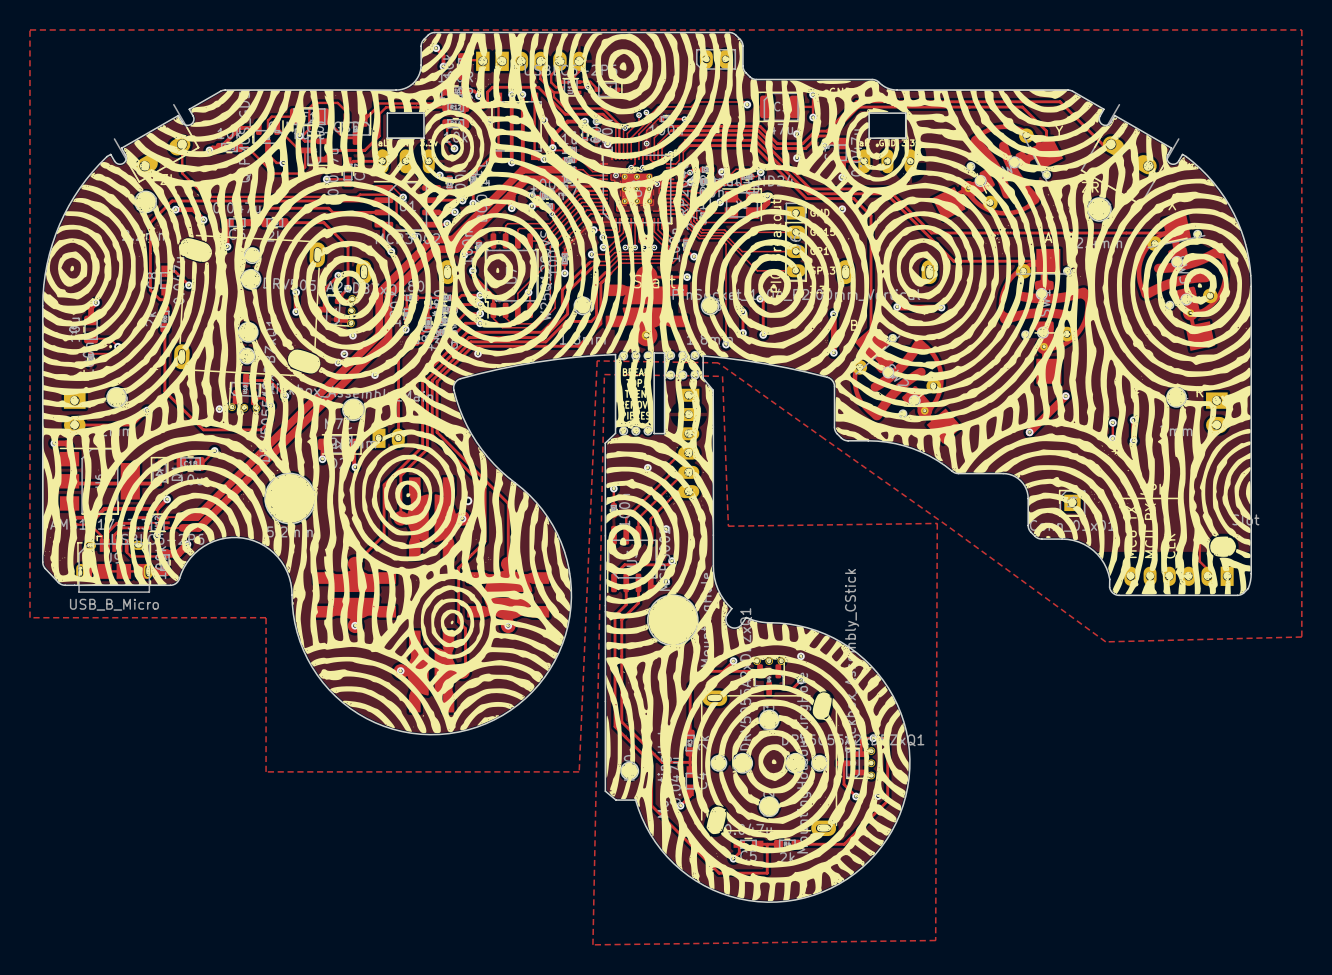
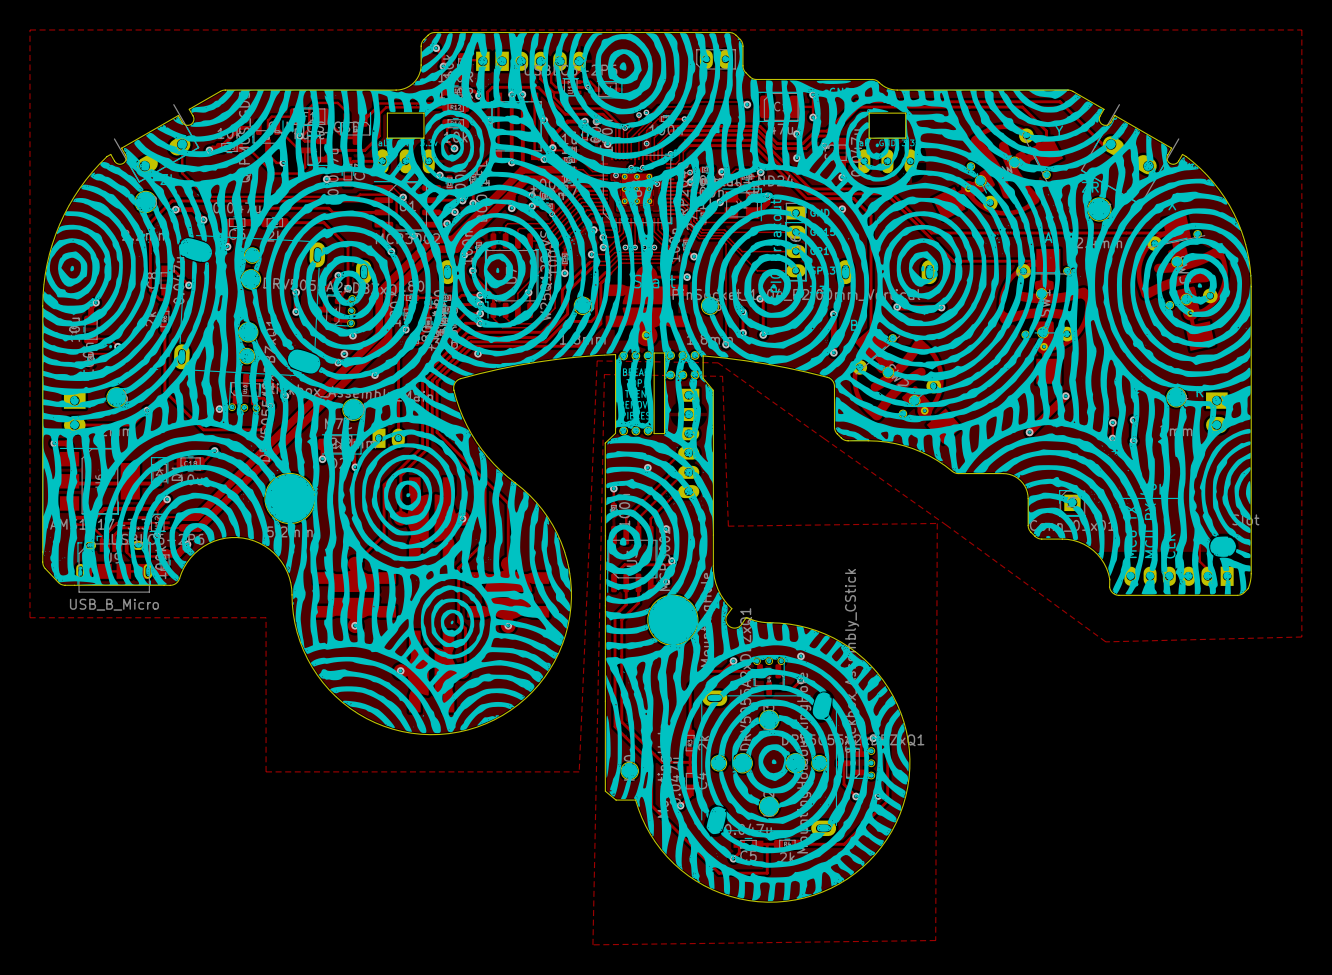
via: (467, 500) -> none

